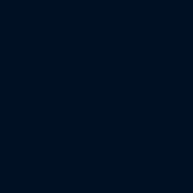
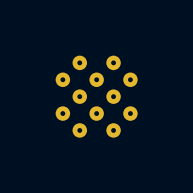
part: none -> (96, 96)

